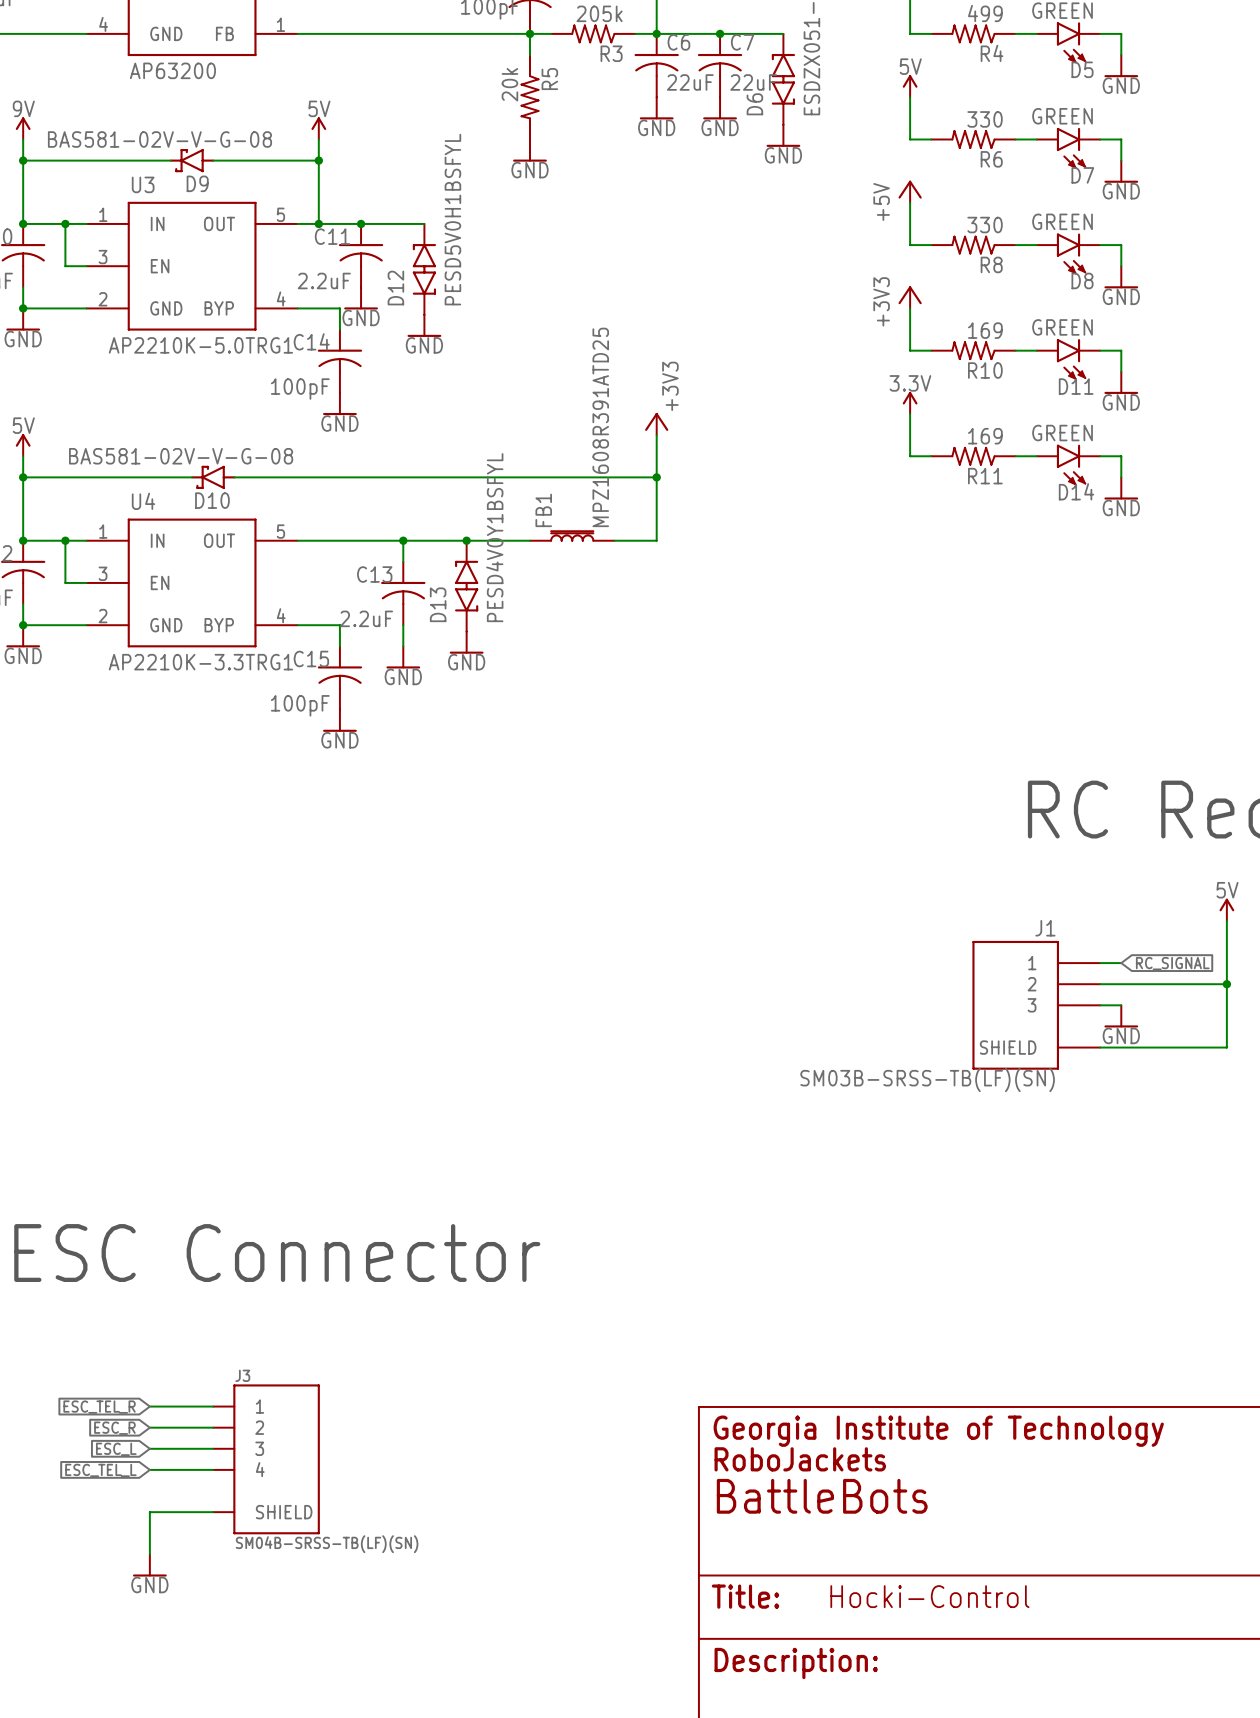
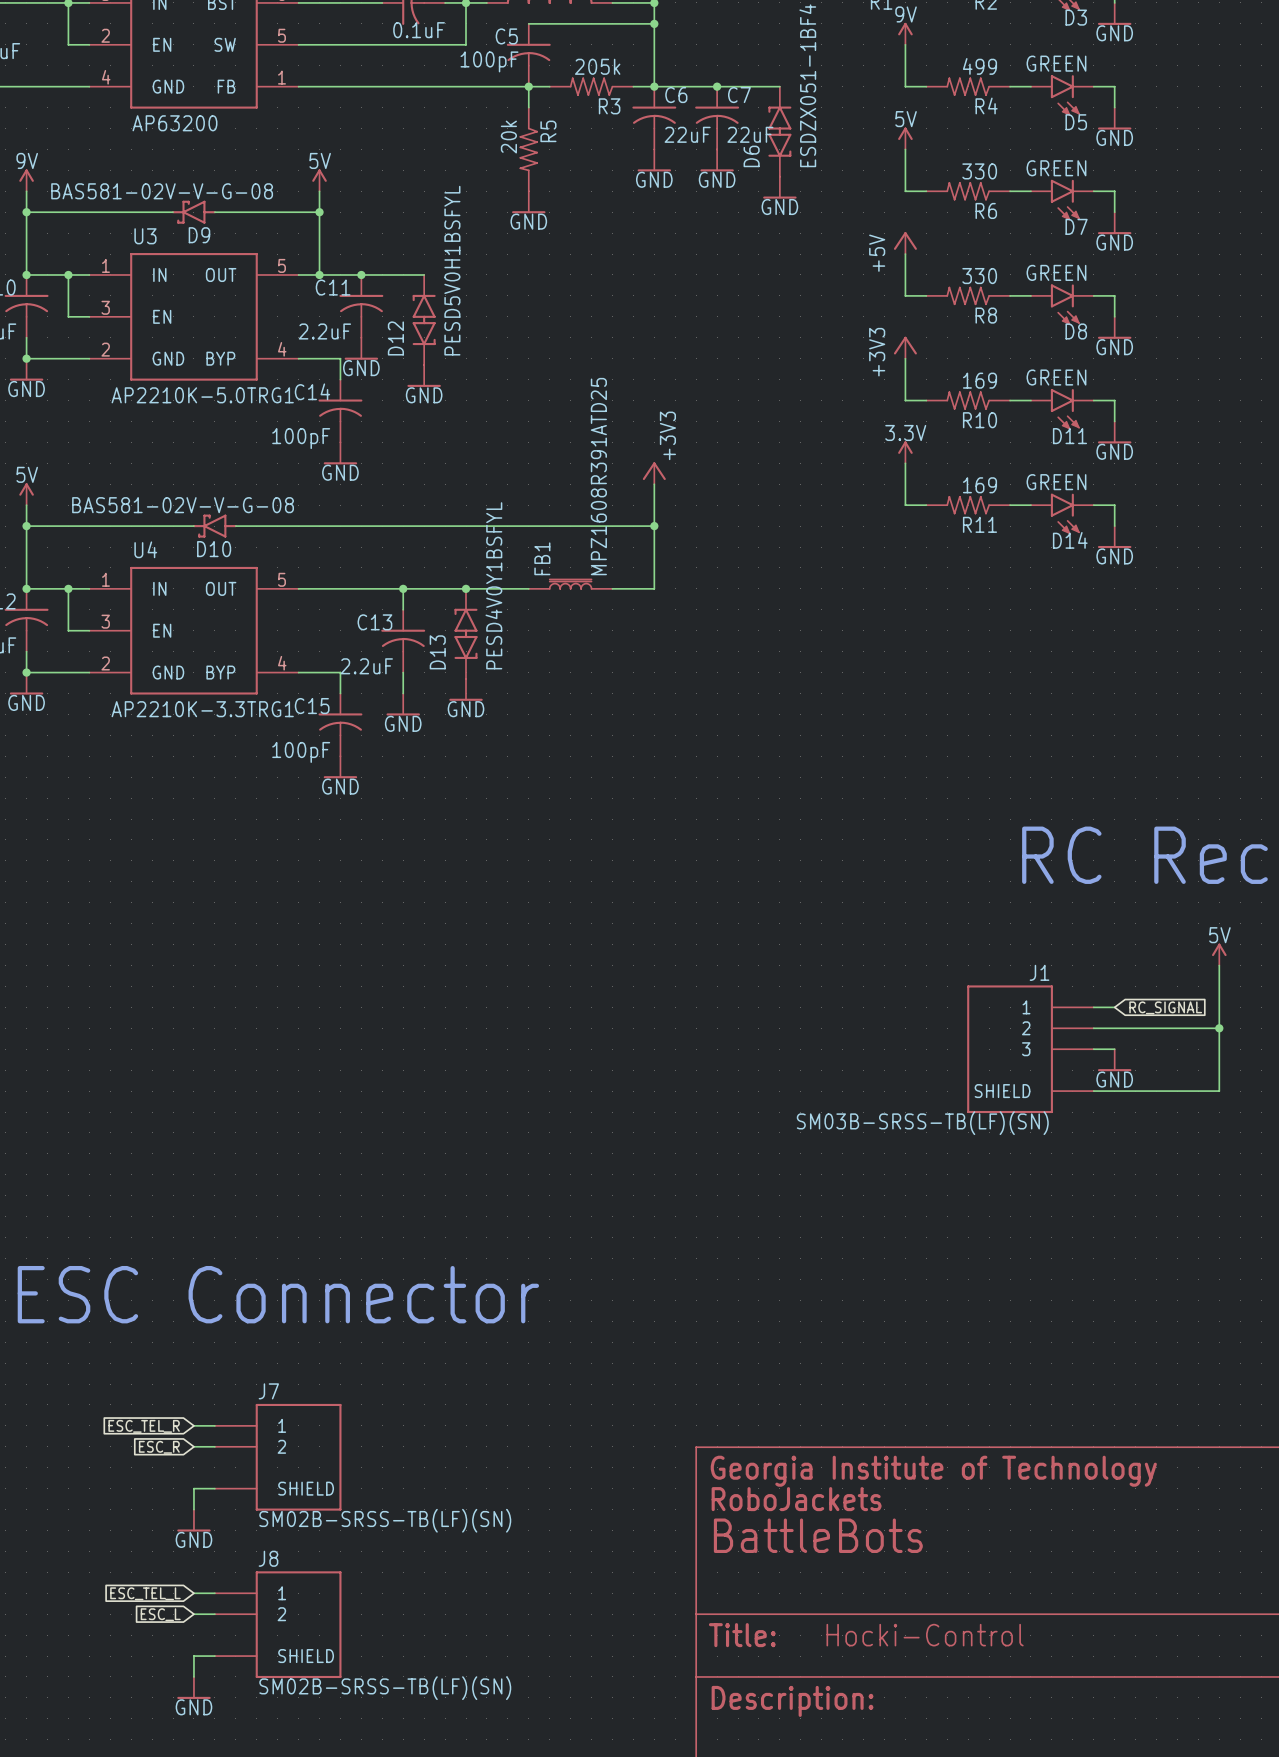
wire: none -> (193, 1425) (214, 1425)
wire: (149, 1406) (192, 1406) -> none
global label position: ESC_TEL_R (99, 1407) -> ESC_TEL_R (144, 1426)
J7: none -> SM02B-SRSS-TB(LF)(SN) (278, 1457)
wire: (149, 1427) (213, 1427) -> none
global label position: ESC_R (114, 1428) -> ESC_R (159, 1447)
wire: (149, 1448) (192, 1448) -> (193, 1509) (193, 1488)
global label position: ESC_L (116, 1449) -> ESC_L (160, 1614)
J3: SM04B-SRSS-TB(LF)(SN) (266, 1459) -> none
wire: (149, 1469) (213, 1469) -> none
global label position: ESC_TEL_L (100, 1470) -> ESC_TEL_L (145, 1593)
power symbol: none -> GND (193, 1520)
wire: (213, 1512) (149, 1512) (149, 1554) -> none
wire: none -> (193, 1593) (214, 1593)
power symbol: GND (149, 1565) -> none
wire: none -> (193, 1614) (214, 1614)
J8: none -> SM02B-SRSS-TB(LF)(SN) (278, 1624)
wire: none -> (214, 1656) (193, 1656) (193, 1676)
power symbol: none -> GND (193, 1687)

